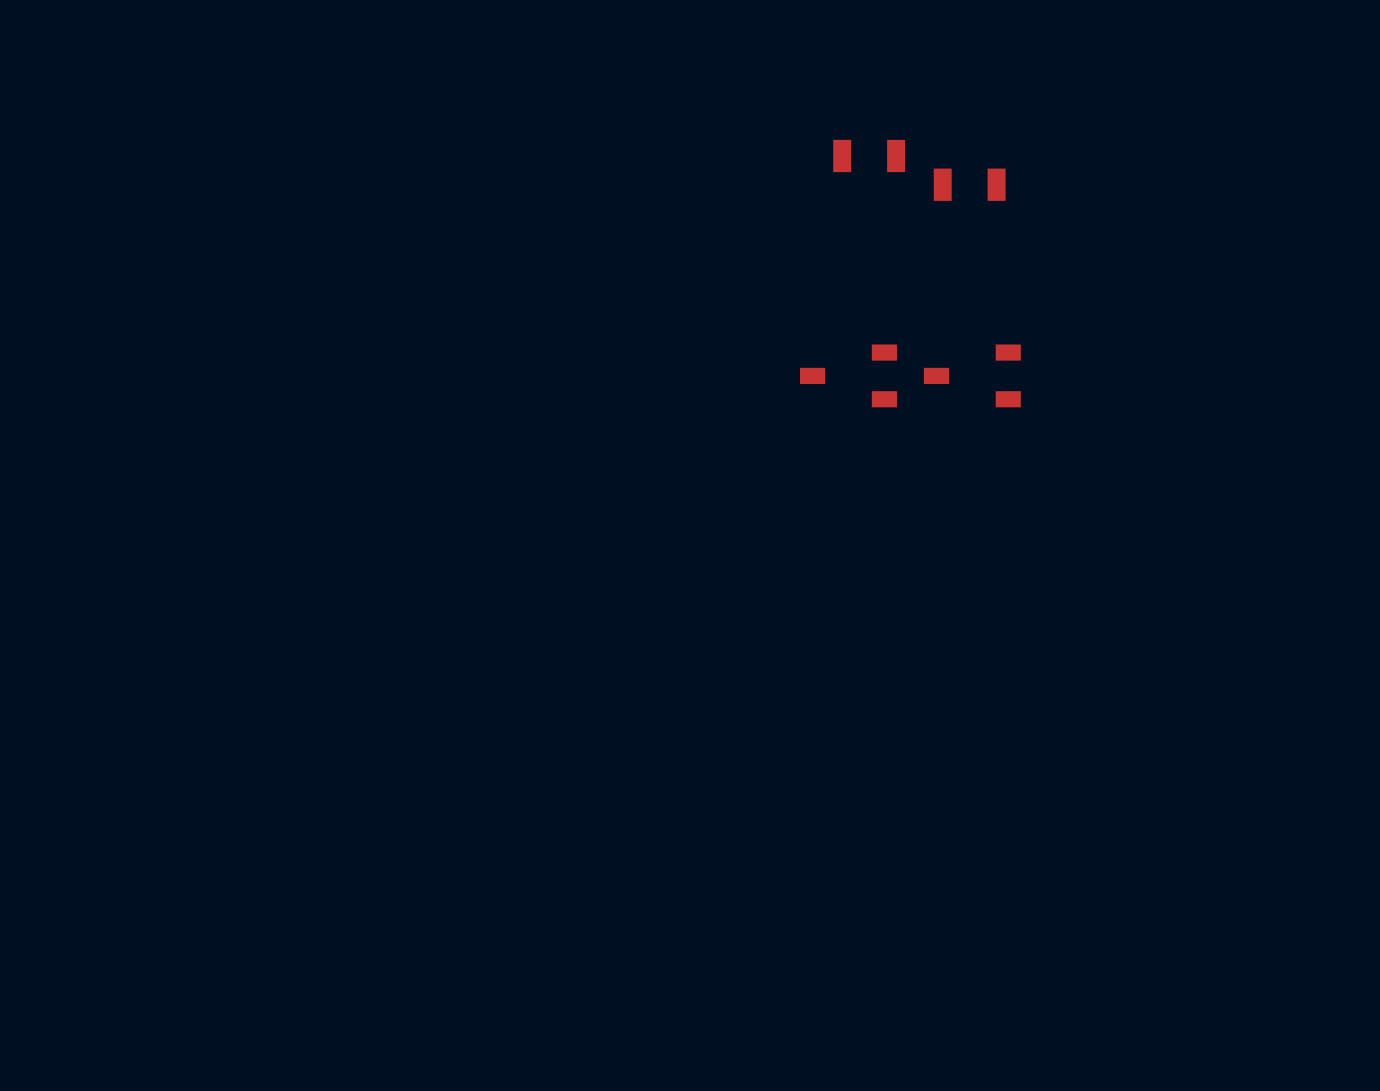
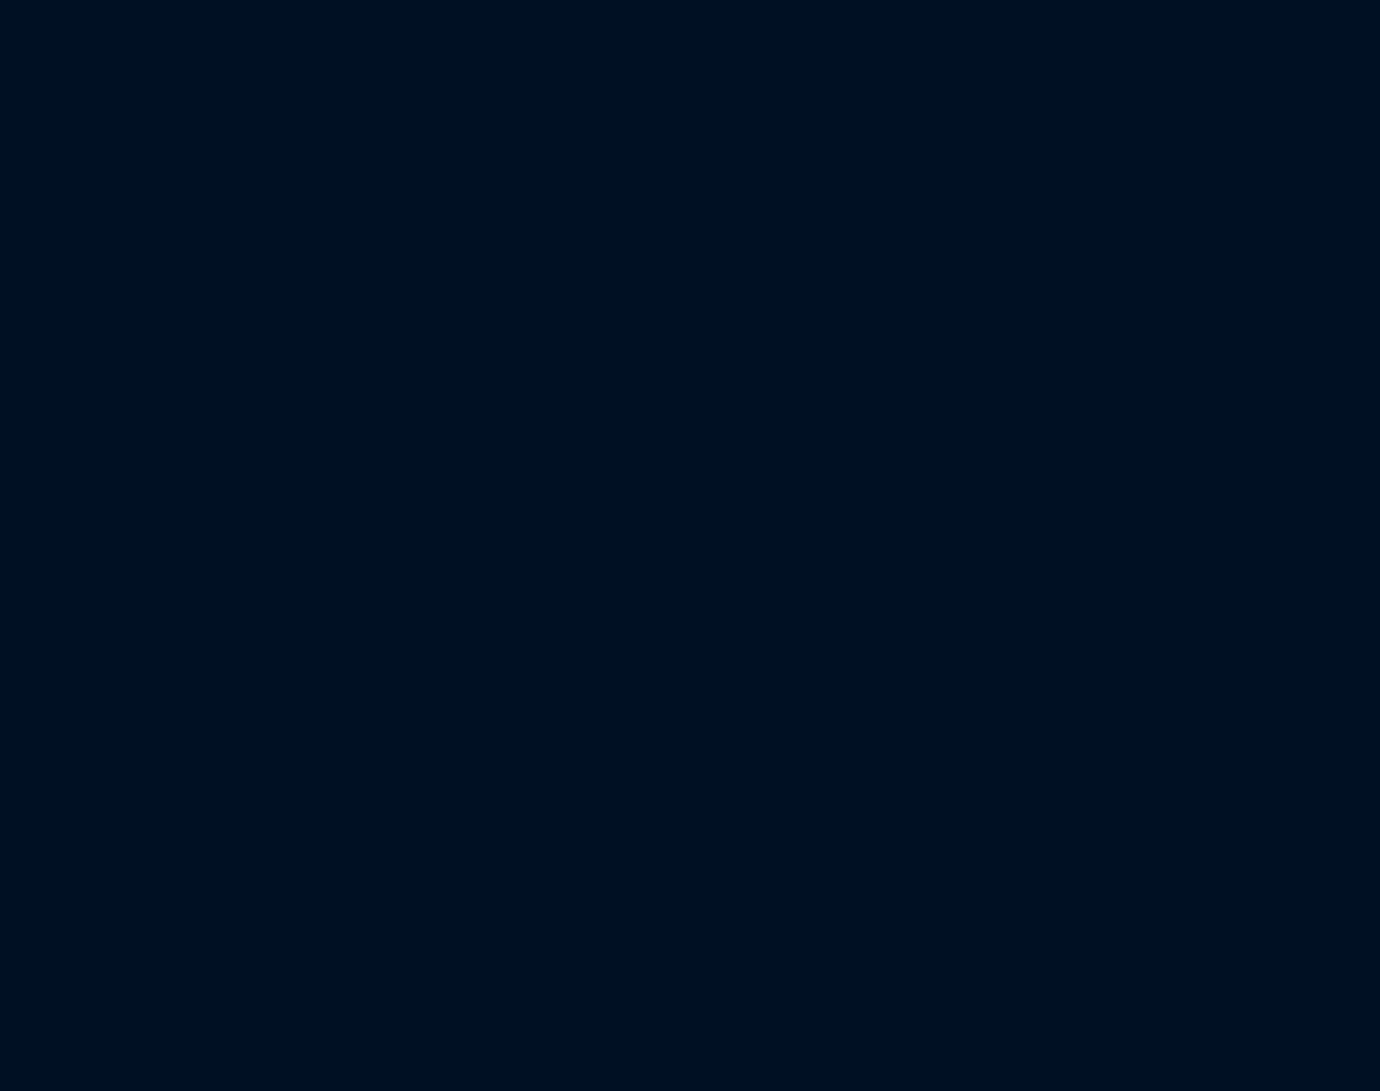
part: (869, 156) -> none
part: (969, 184) -> none
part: (848, 375) -> none
part: (972, 375) -> none

